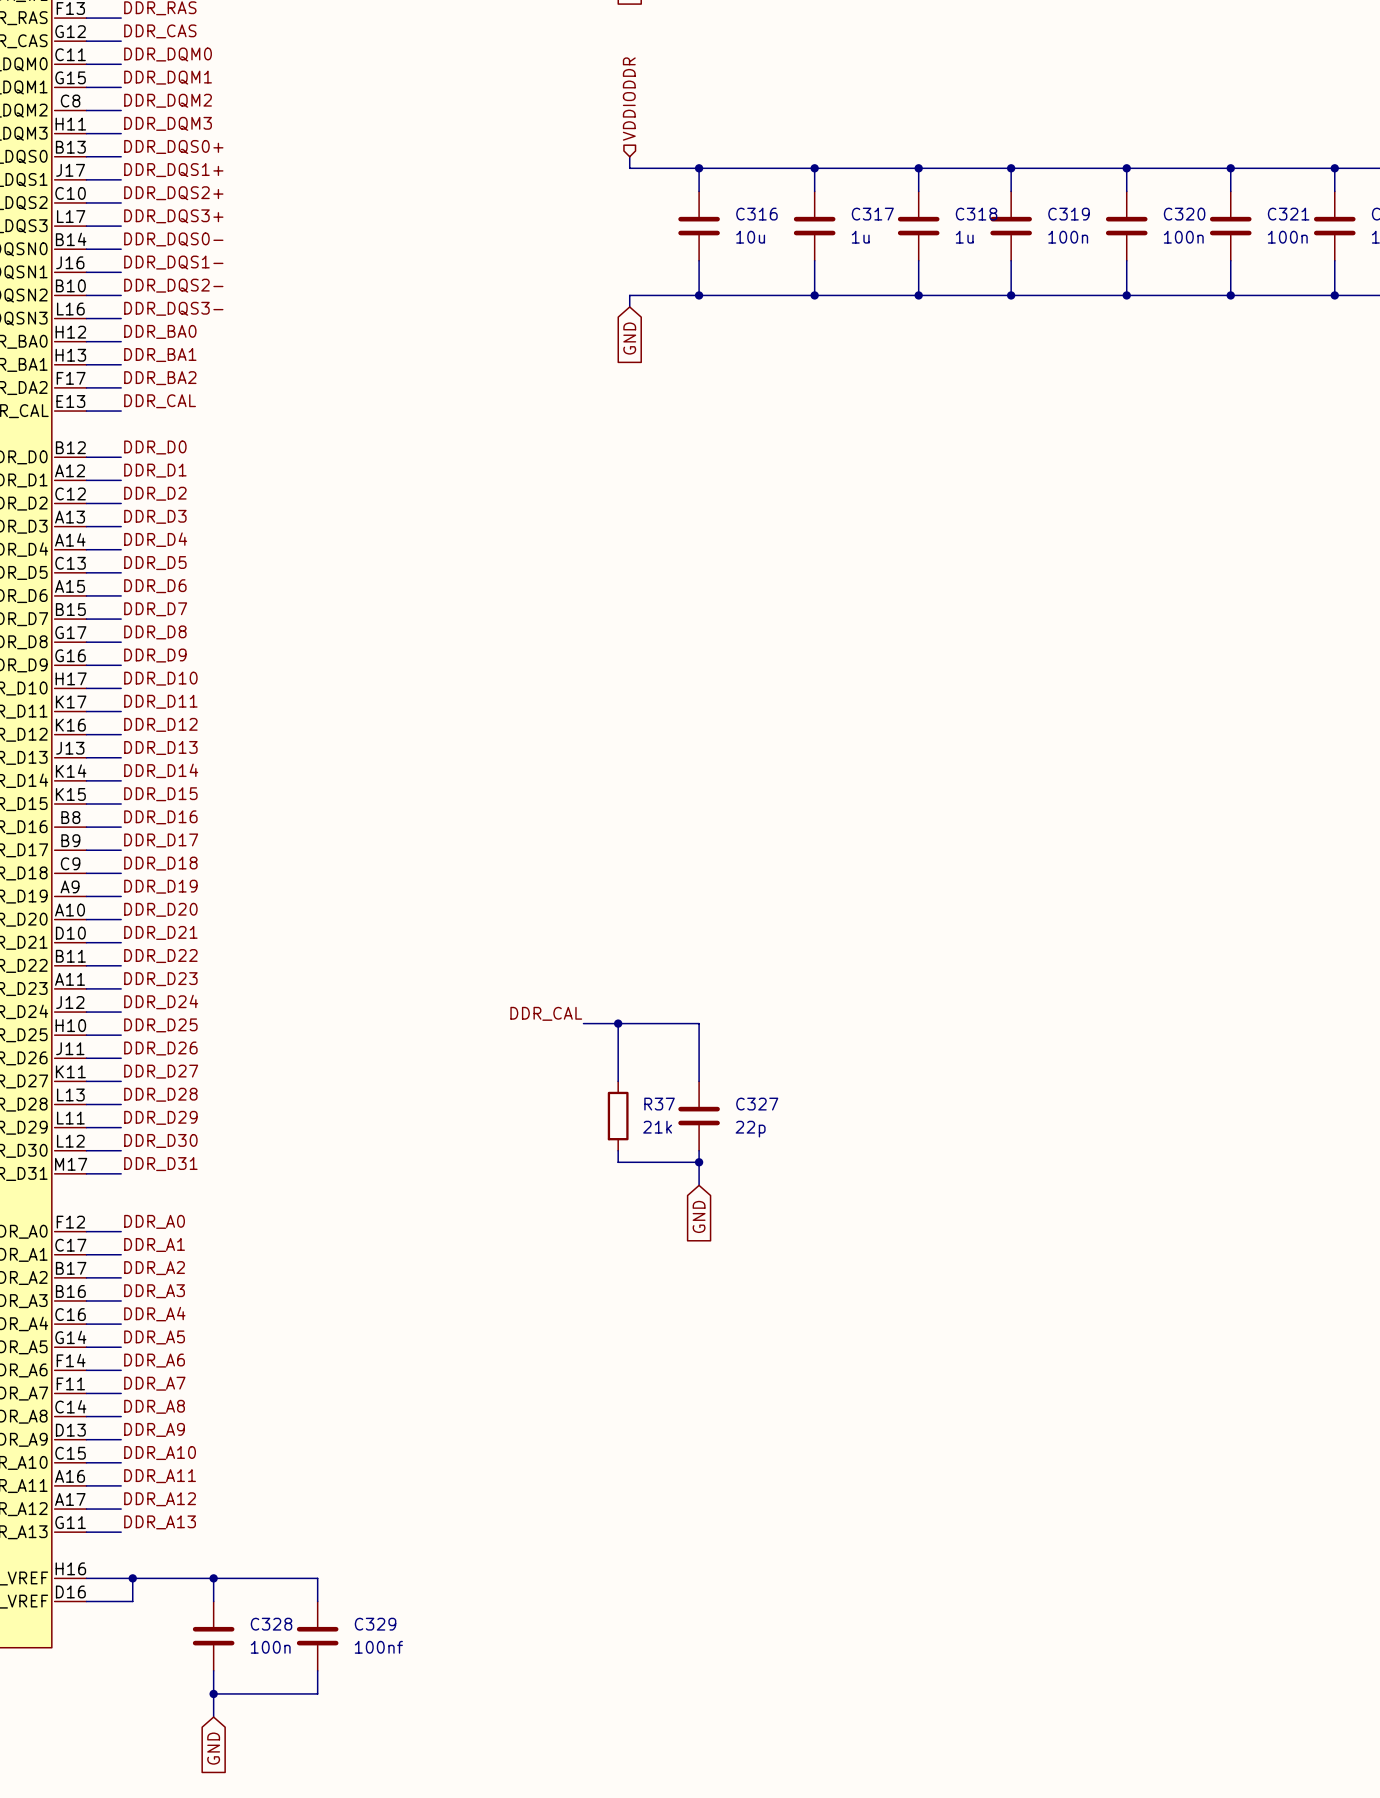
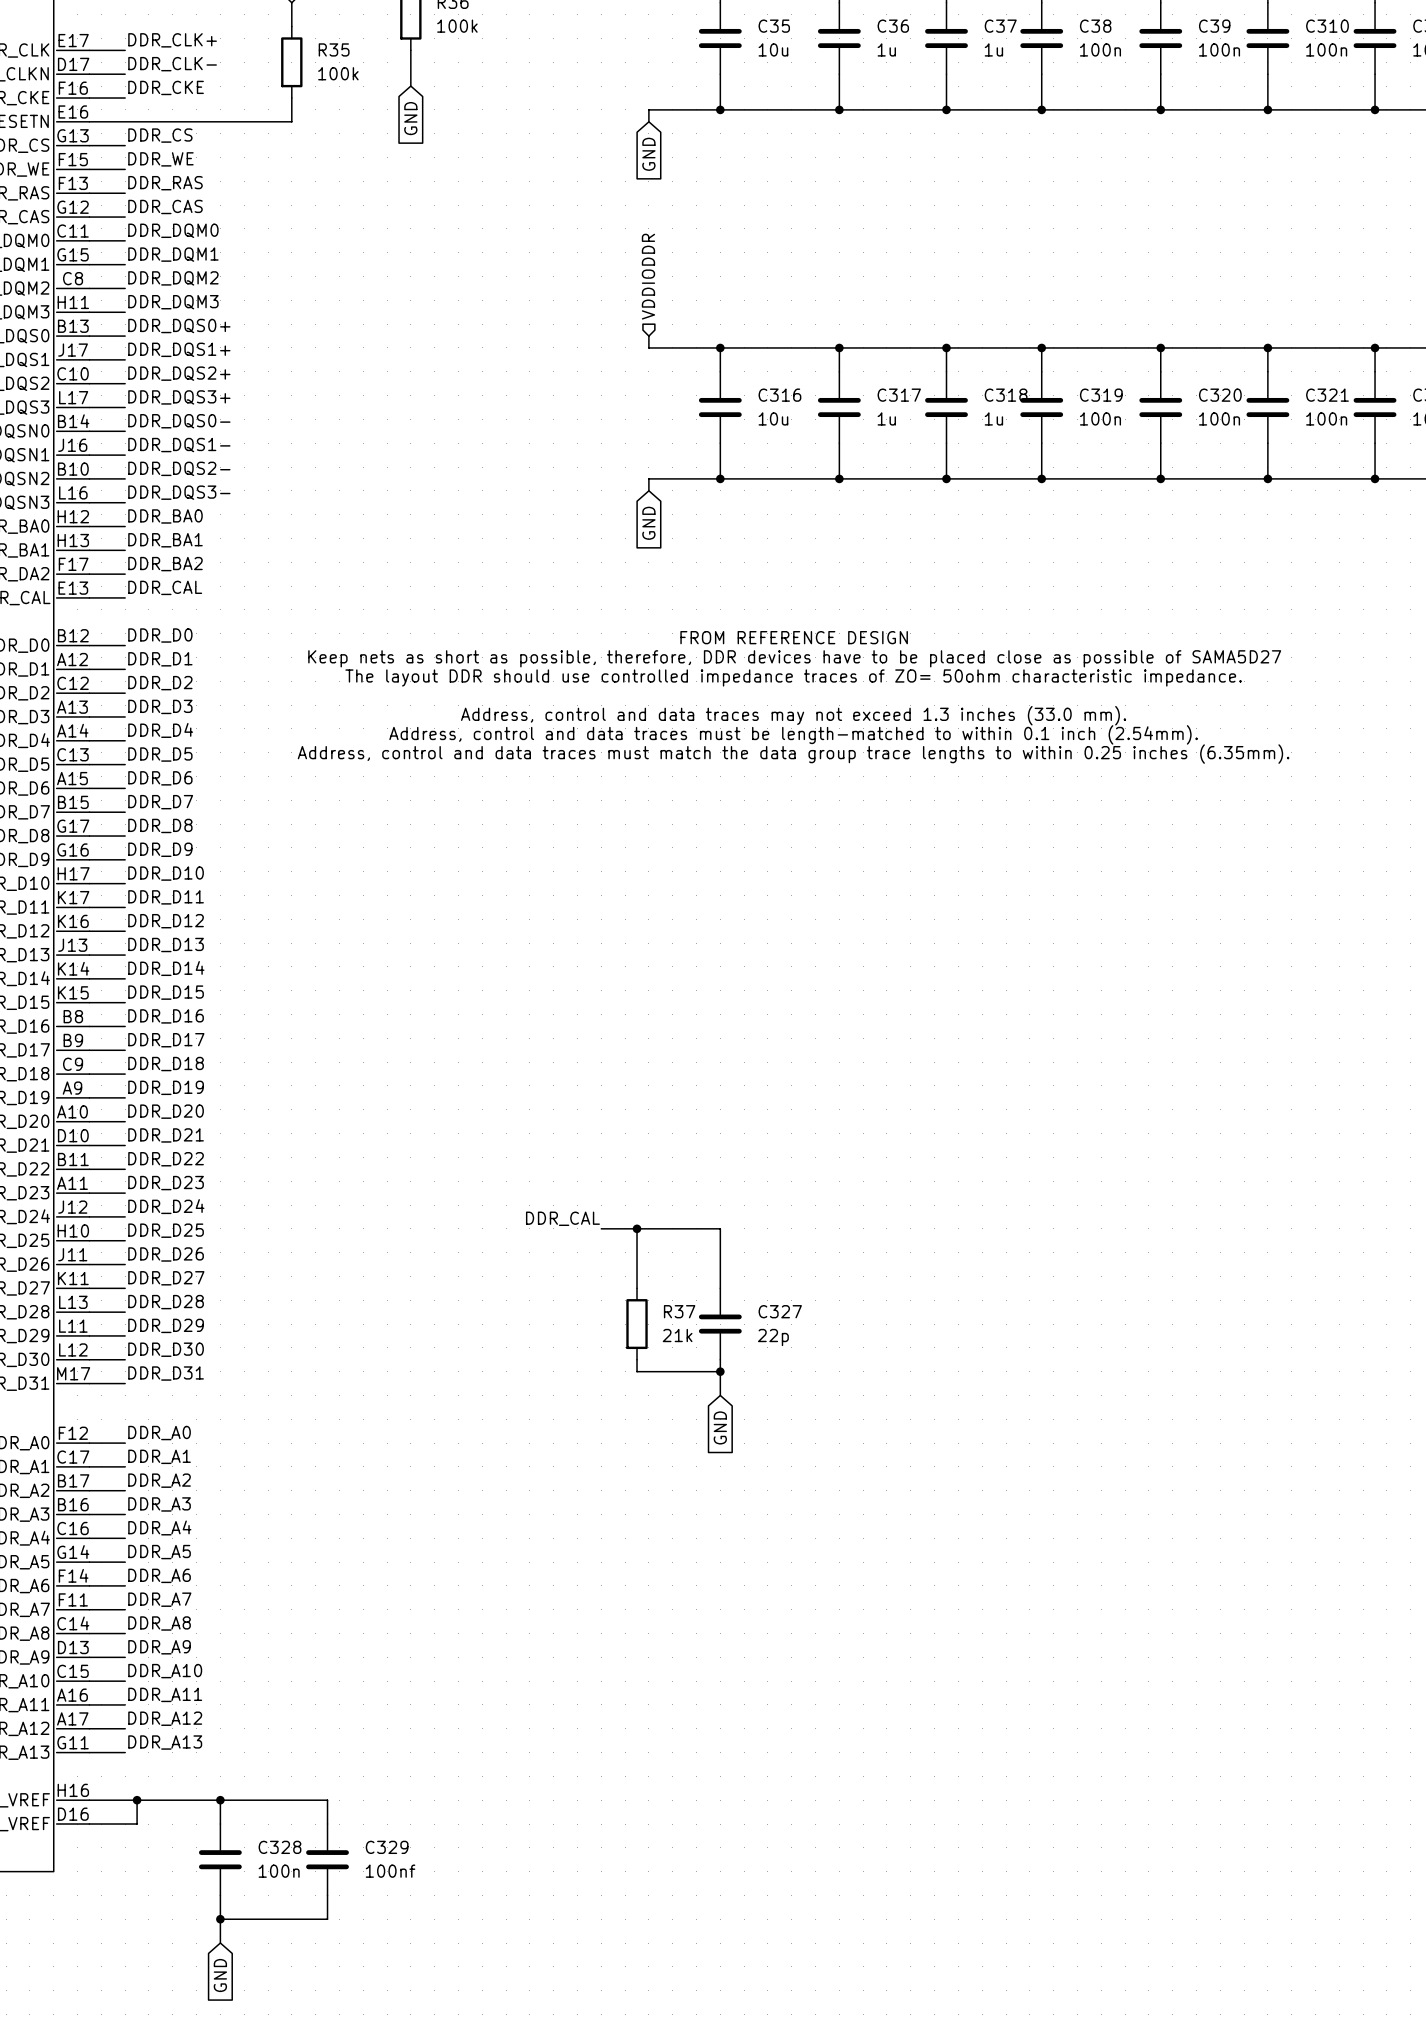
text: none -> FROM REFERENCE DESIGN (794, 637)
text: none -> Keep nets as short as possible, therefore, DDR devices have to be placed close as possible of SAMA5D27 (794, 658)
text: none -> The layout DDR should use controlled impedance traces of ZO= 50ohm characteristic impedance. (793, 677)
text: none -> Address, control and data traces may not exceed 1.3 inches (33.0 mm). (793, 715)
text: none -> Address, control and data traces must be length-matched to within 0.1 inch (2.54mm). (793, 734)
text: none -> Address, control and data traces must match the data group trace lengths to within 0.25 inches (6.35mm). (793, 754)

